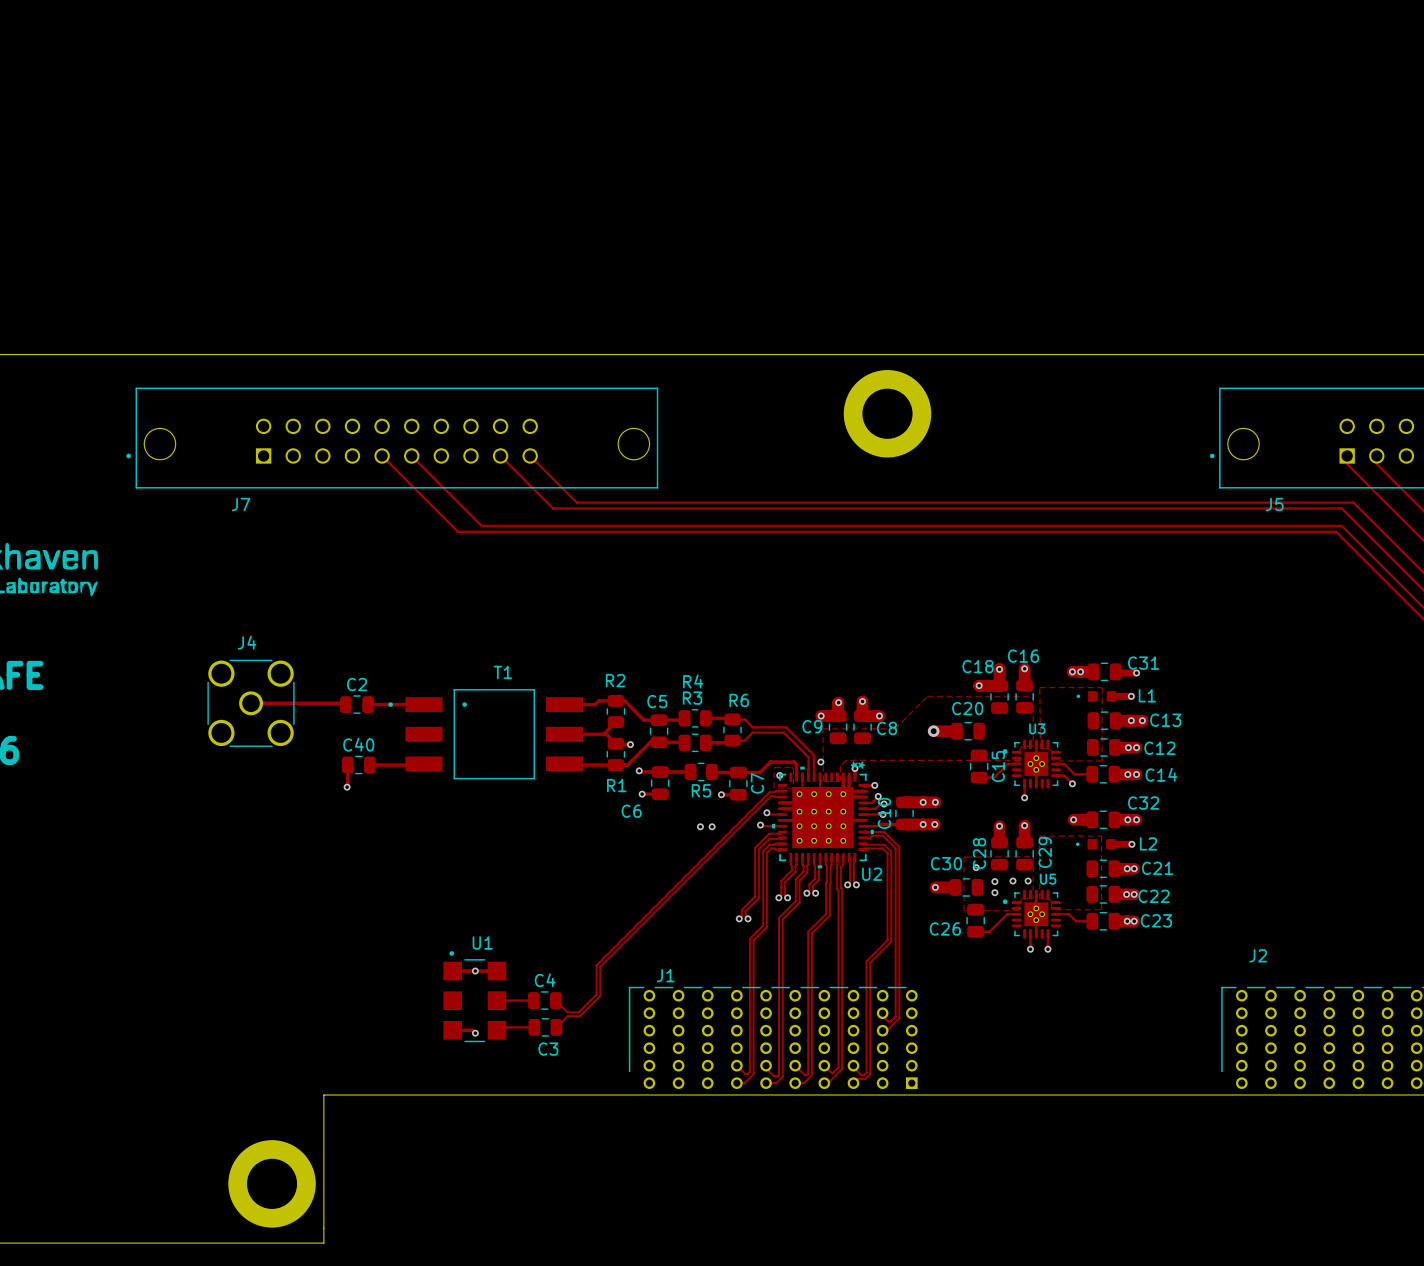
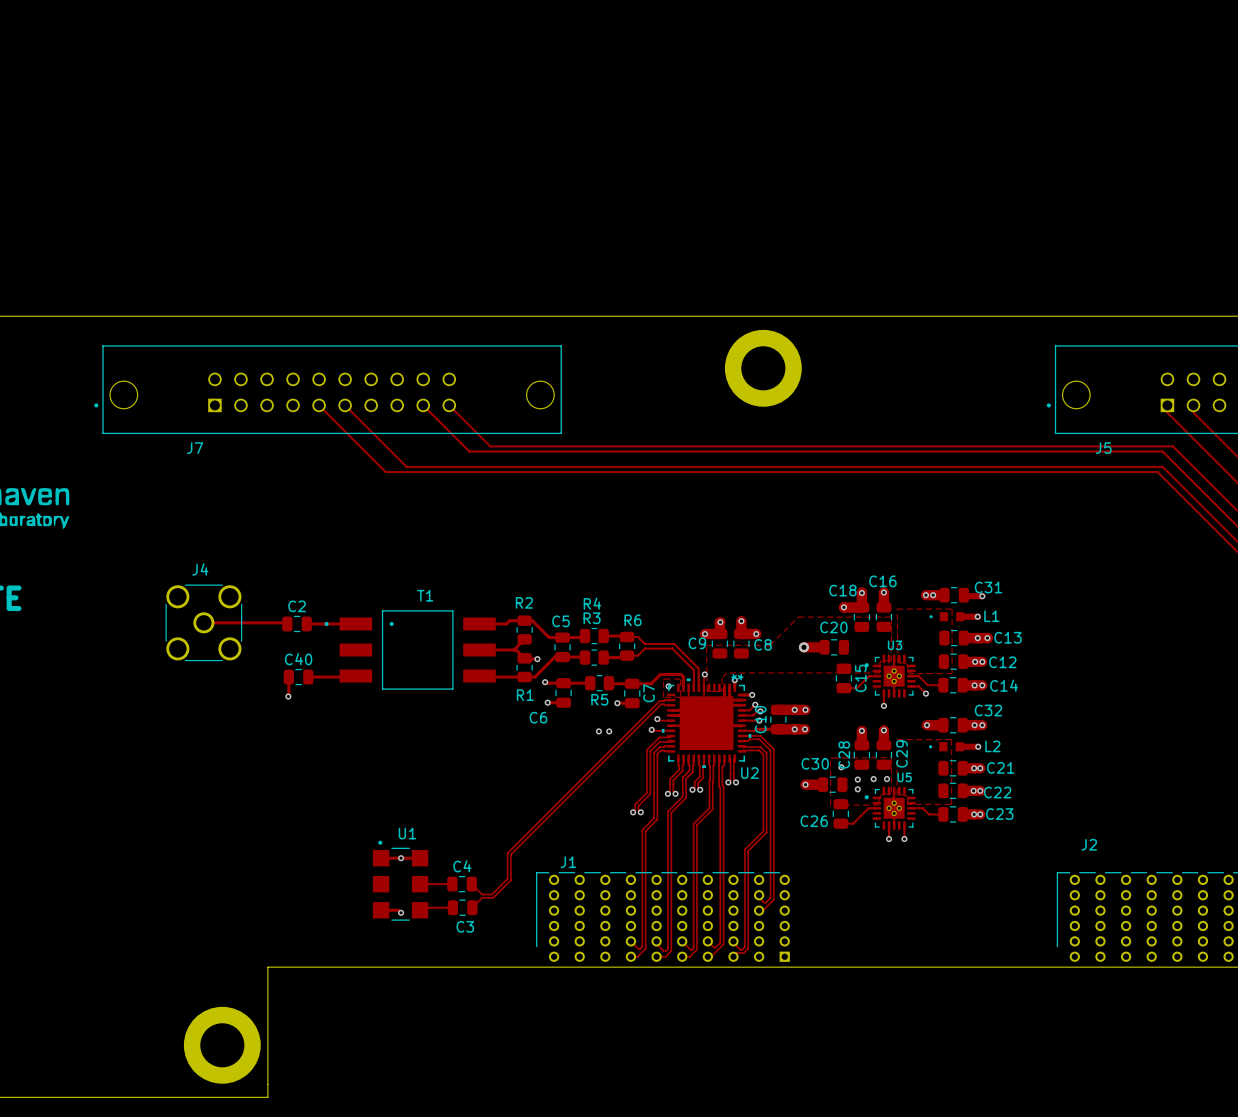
track: none -> (704, 675) (704, 687)
U2 footprint: [772, 766, 874, 869] -> [661, 678, 752, 768]

